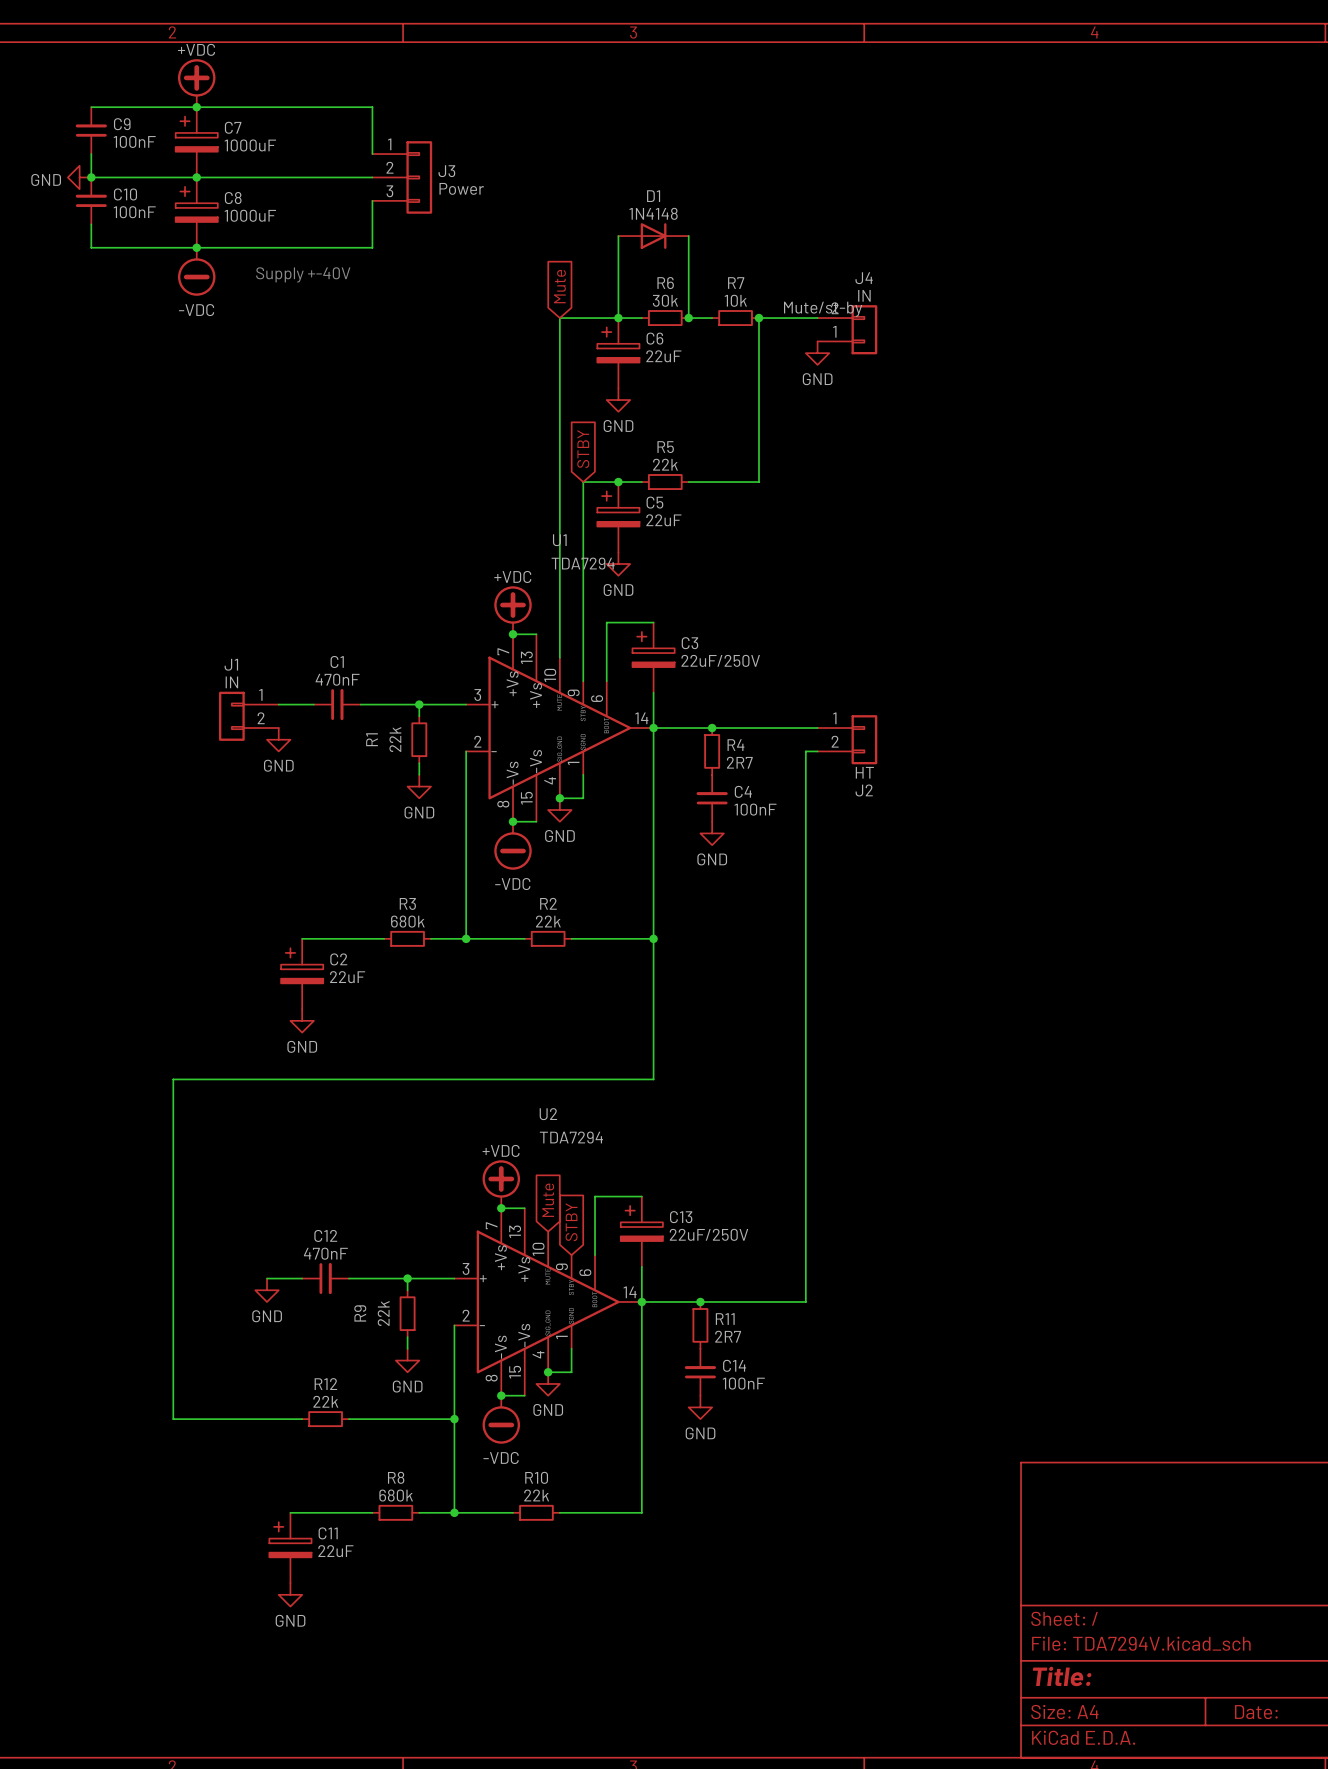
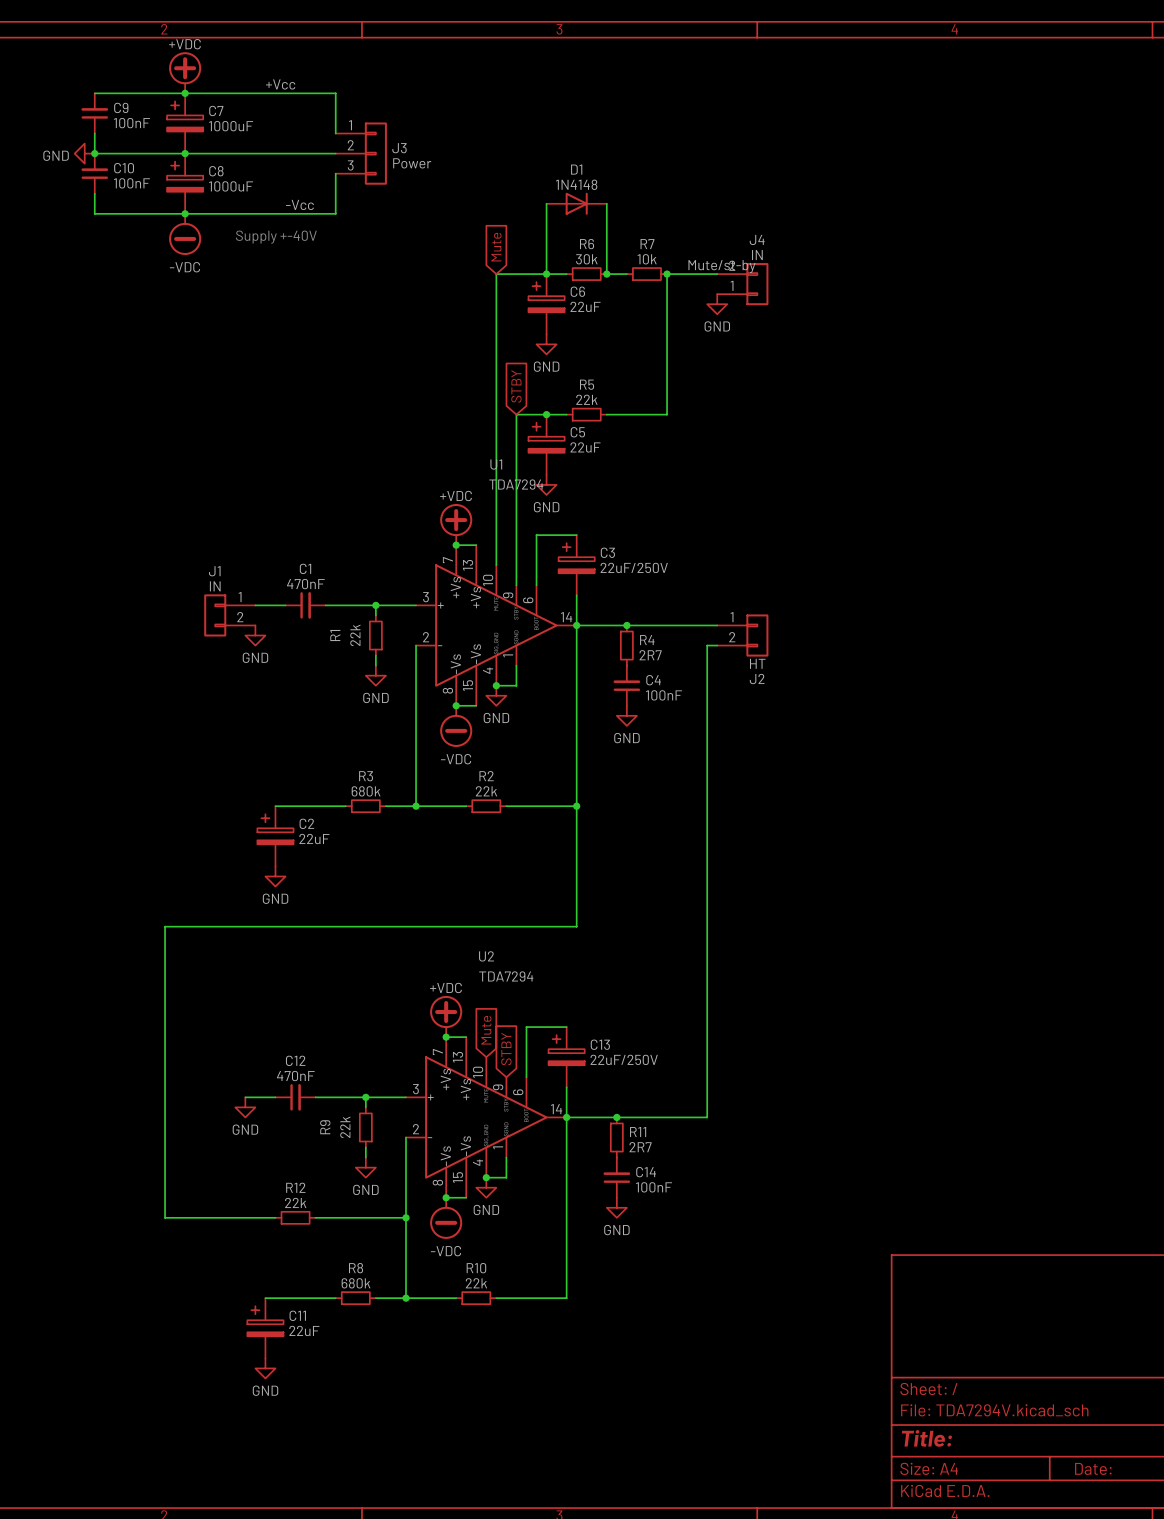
label: none -> +Vcc (280, 84)
label: none -> -Vcc (299, 204)

